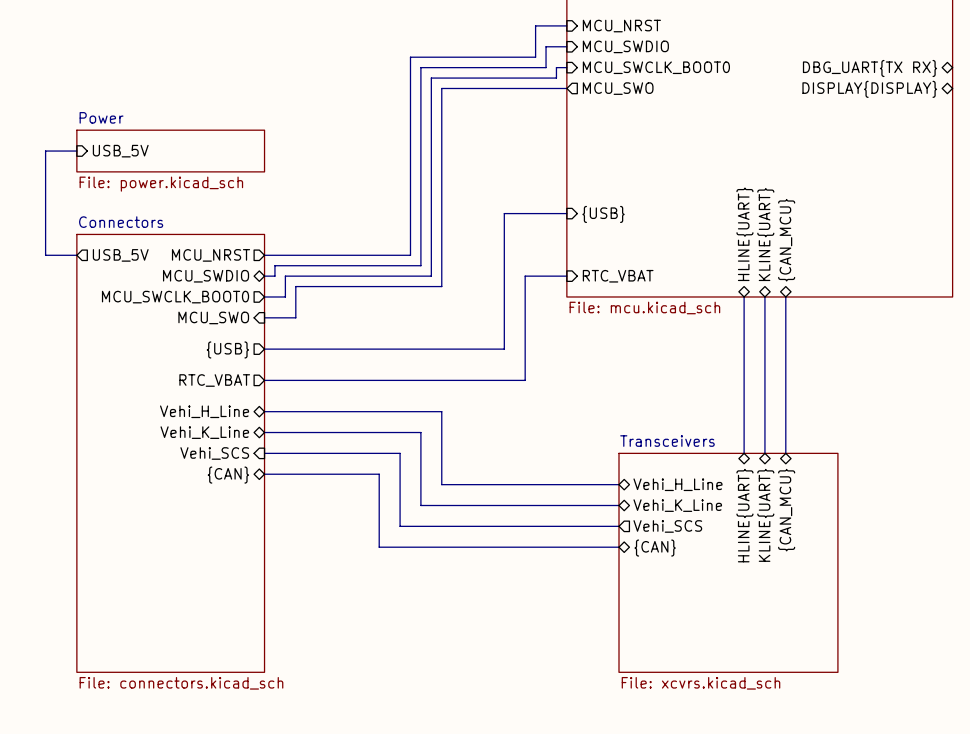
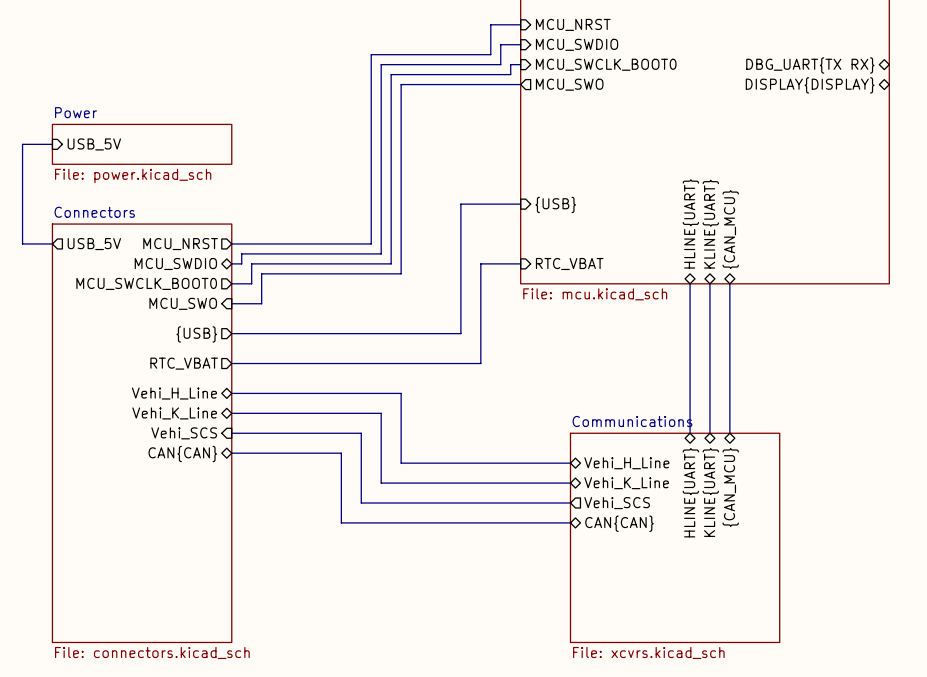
sheet Transceivers name: Transceivers (667, 441) -> Communications (632, 421)
sheet pin: {CAN} (228, 475) -> CAN{CAN} (182, 454)
sheet pin: {CAN} (655, 548) -> CAN{CAN} (619, 523)

